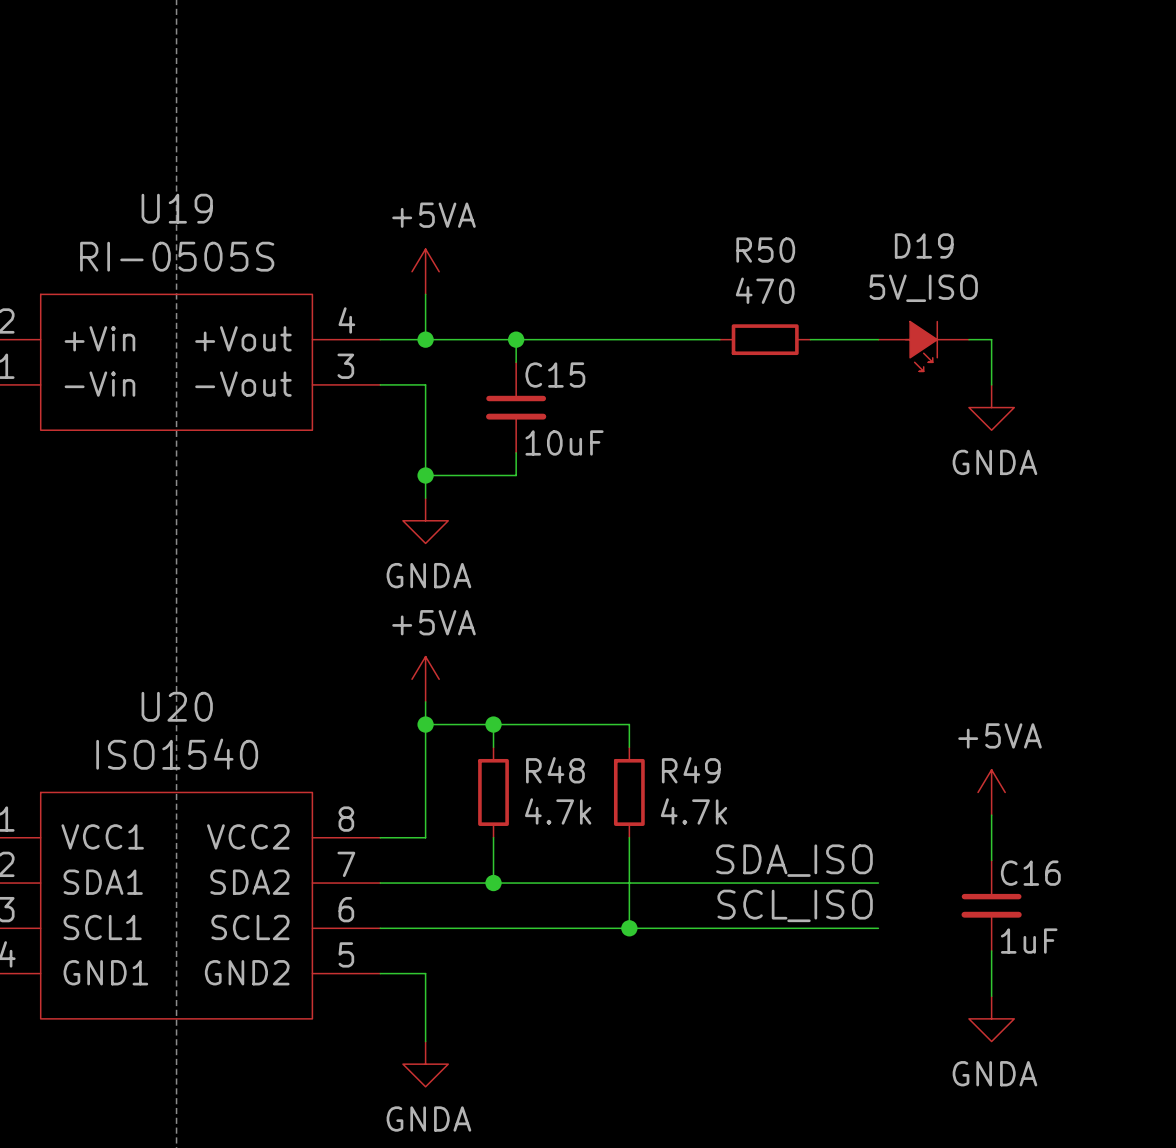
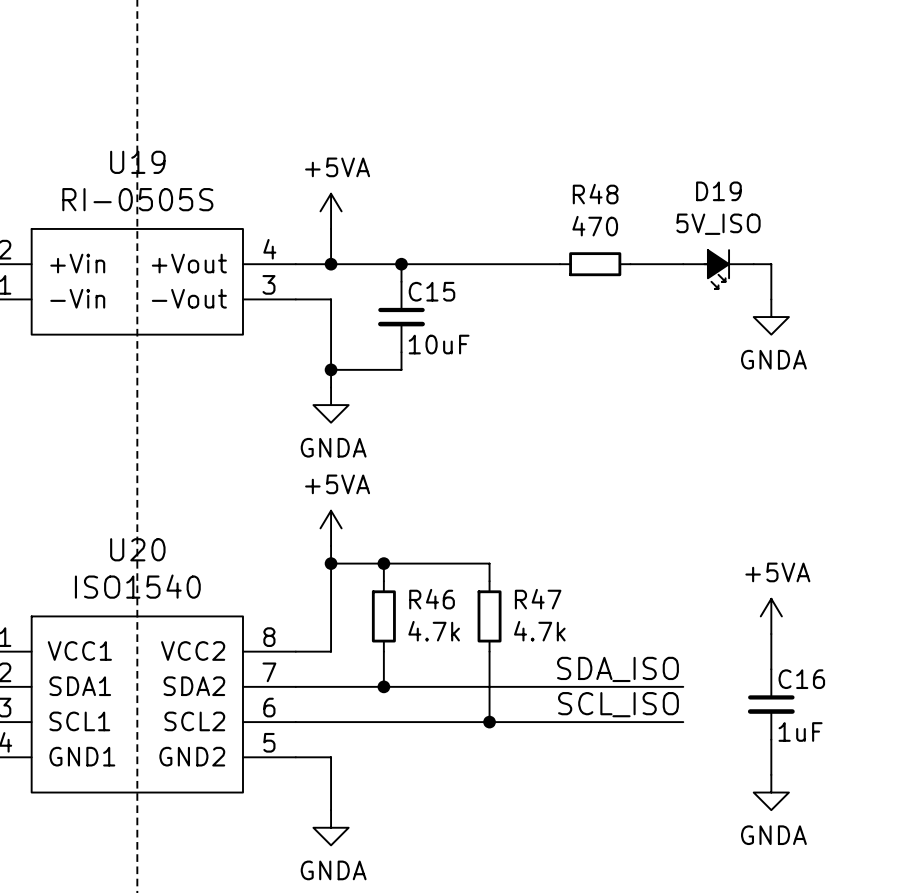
R50 name: R50 (765, 250) -> R48 (595, 194)
R48 name: R48 (555, 770) -> R46 (432, 599)
R49 name: R49 (691, 770) -> R47 (538, 599)

